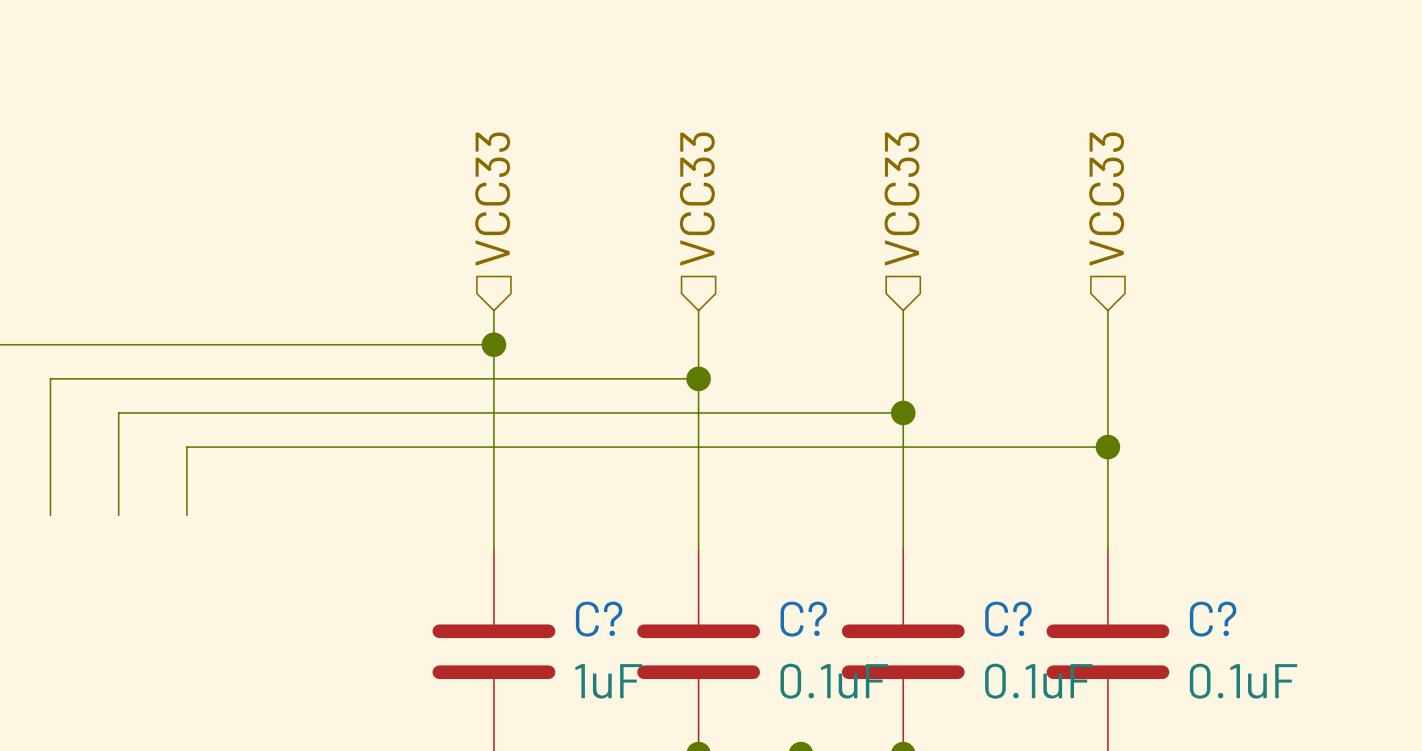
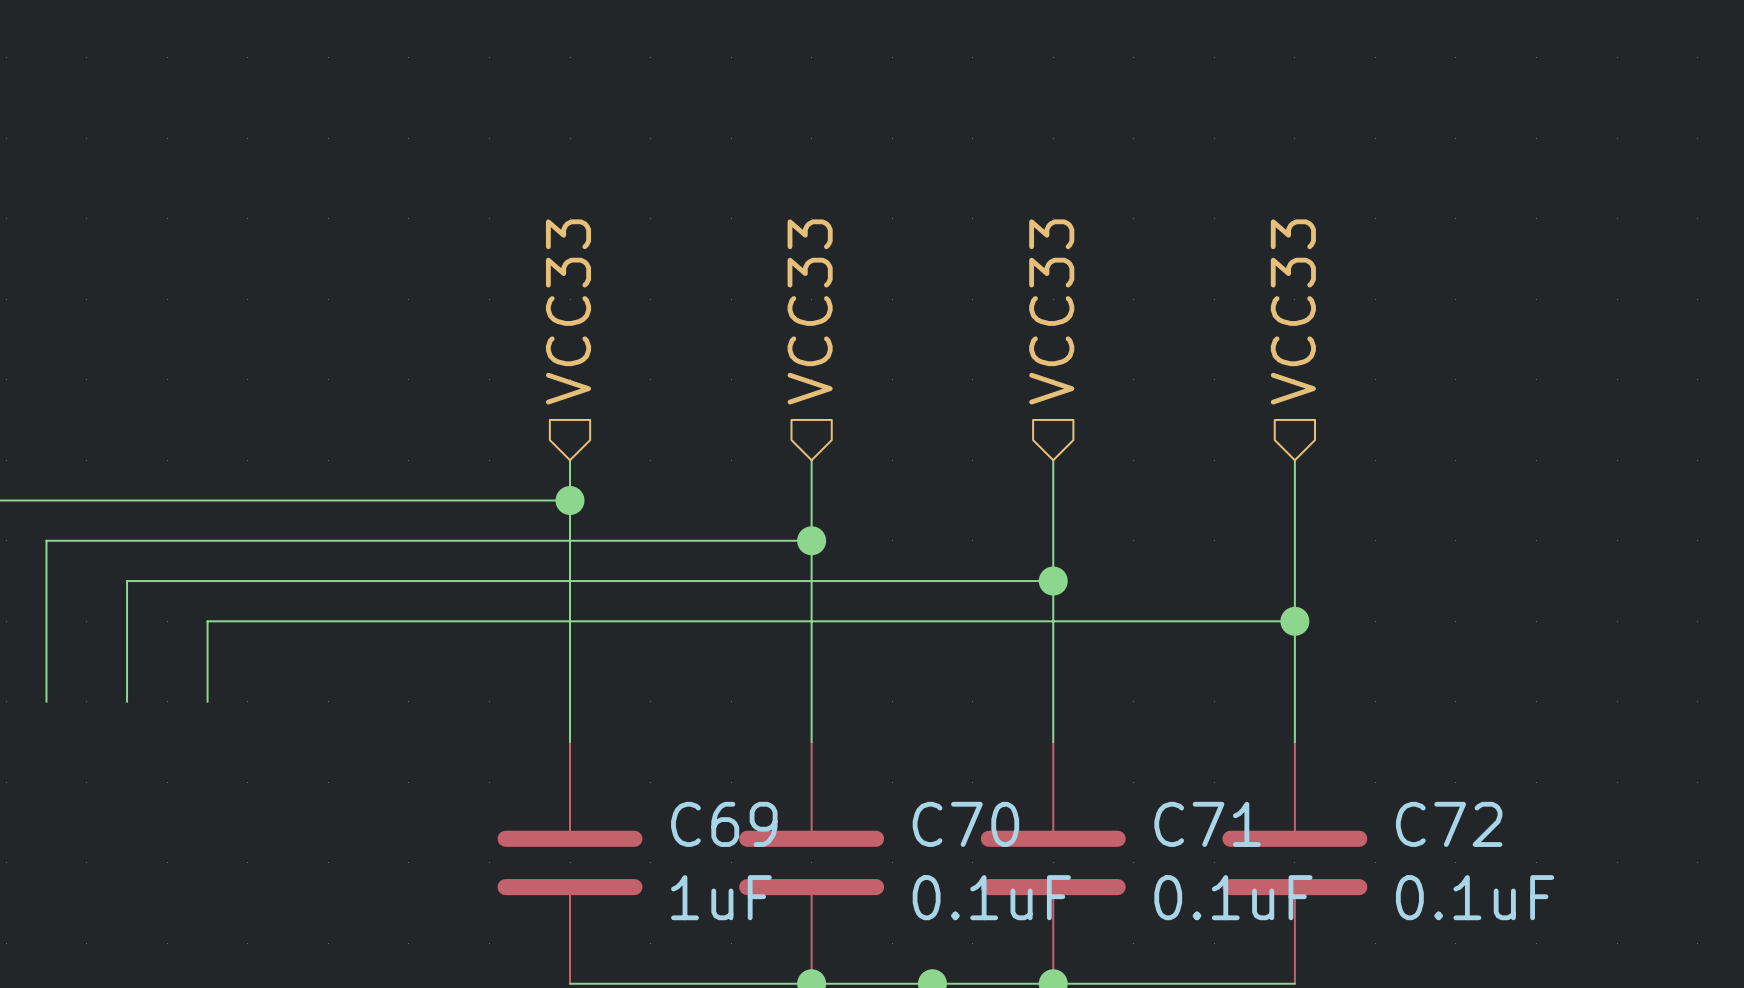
C? name: C? (599, 619) -> C69 (724, 824)
C? name: C? (803, 619) -> C70 (965, 824)
C? name: C? (1008, 619) -> C71 (1207, 824)
C? name: C? (1213, 619) -> C72 (1449, 824)

